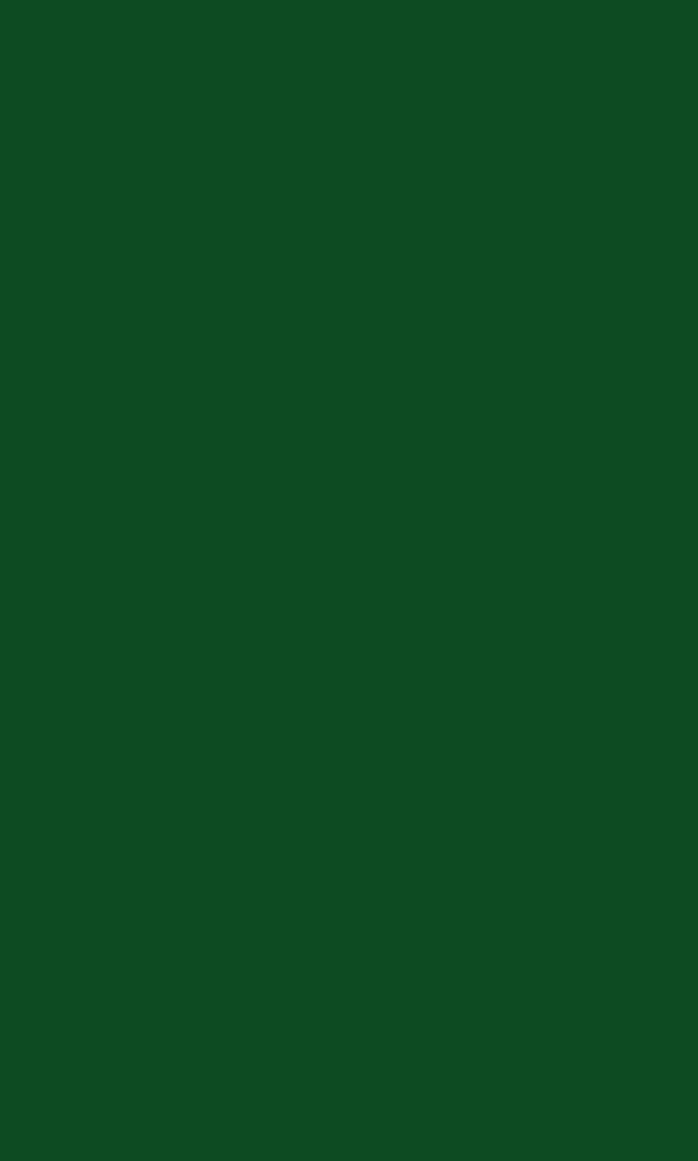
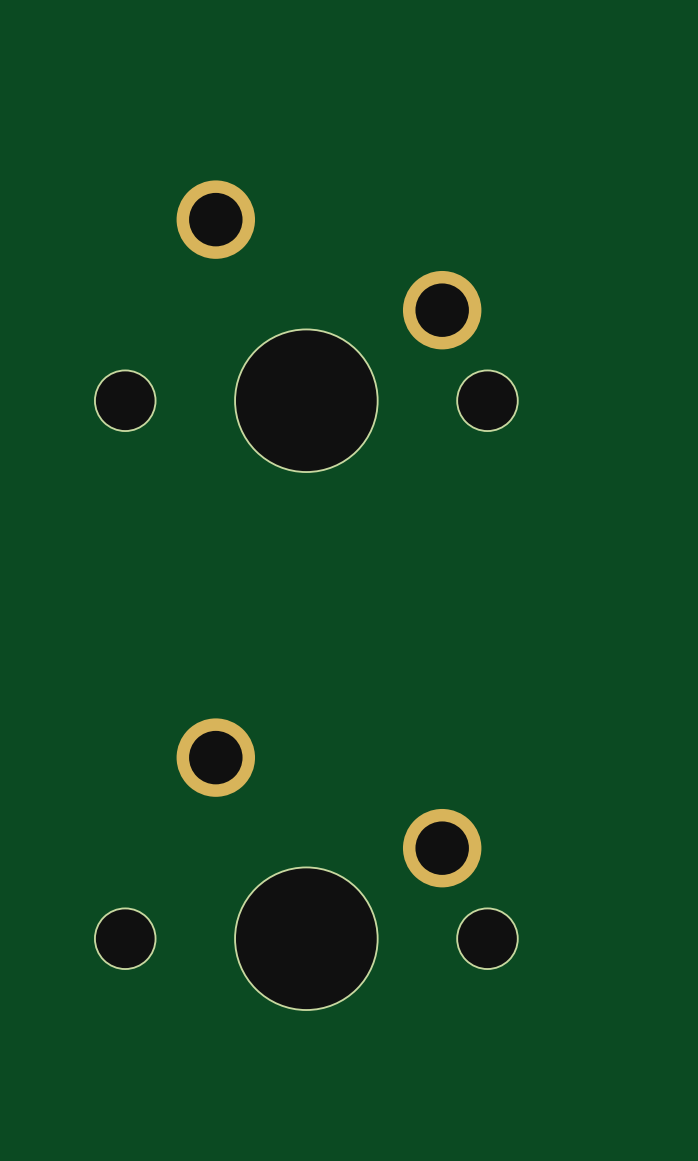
part: none -> (306, 326)
part: none -> (306, 864)

